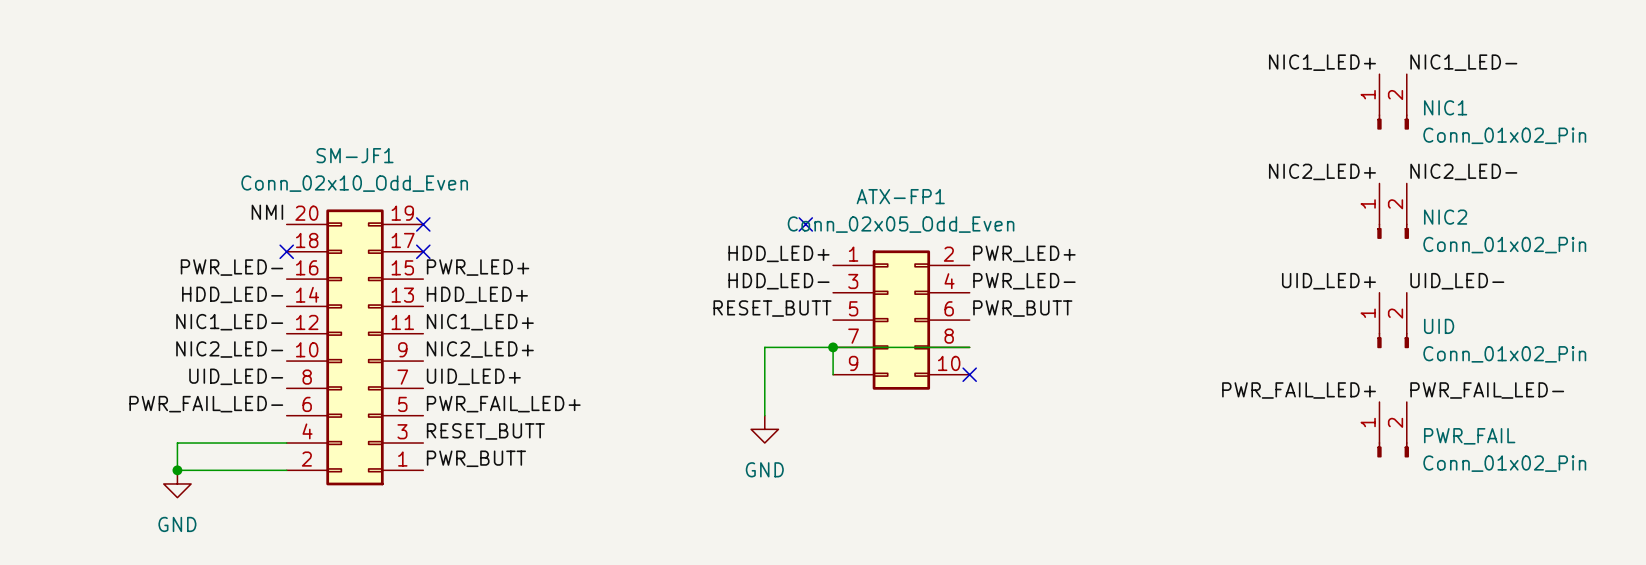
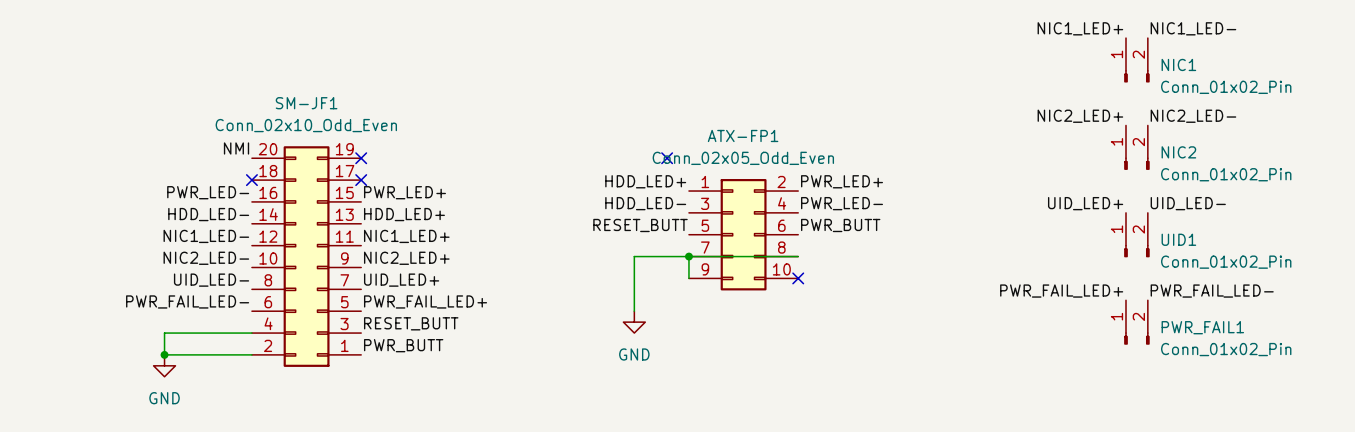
UID name: UID (1439, 326) -> UID1 (1178, 239)
PWR_FAIL name: PWR_FAIL (1469, 436) -> PWR_FAIL1 (1202, 327)

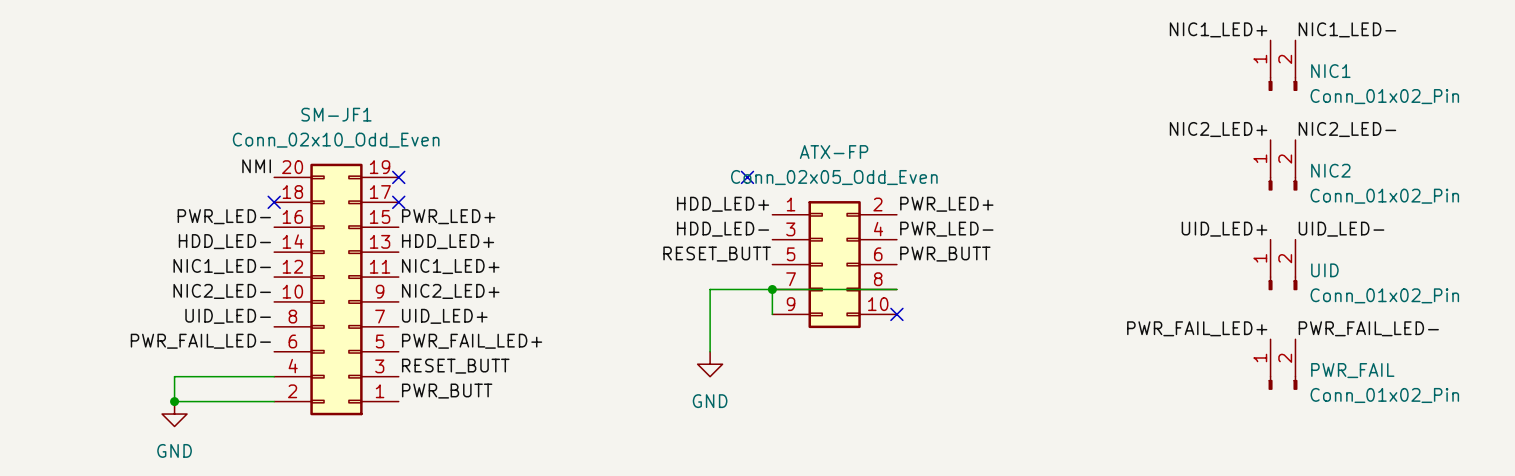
ATX-FP1 name: ATX-FP1 (743, 135) -> ATX-FP (834, 152)
UID1 name: UID1 (1178, 239) -> UID (1324, 270)
PWR_FAIL1 name: PWR_FAIL1 (1202, 327) -> PWR_FAIL (1352, 370)

